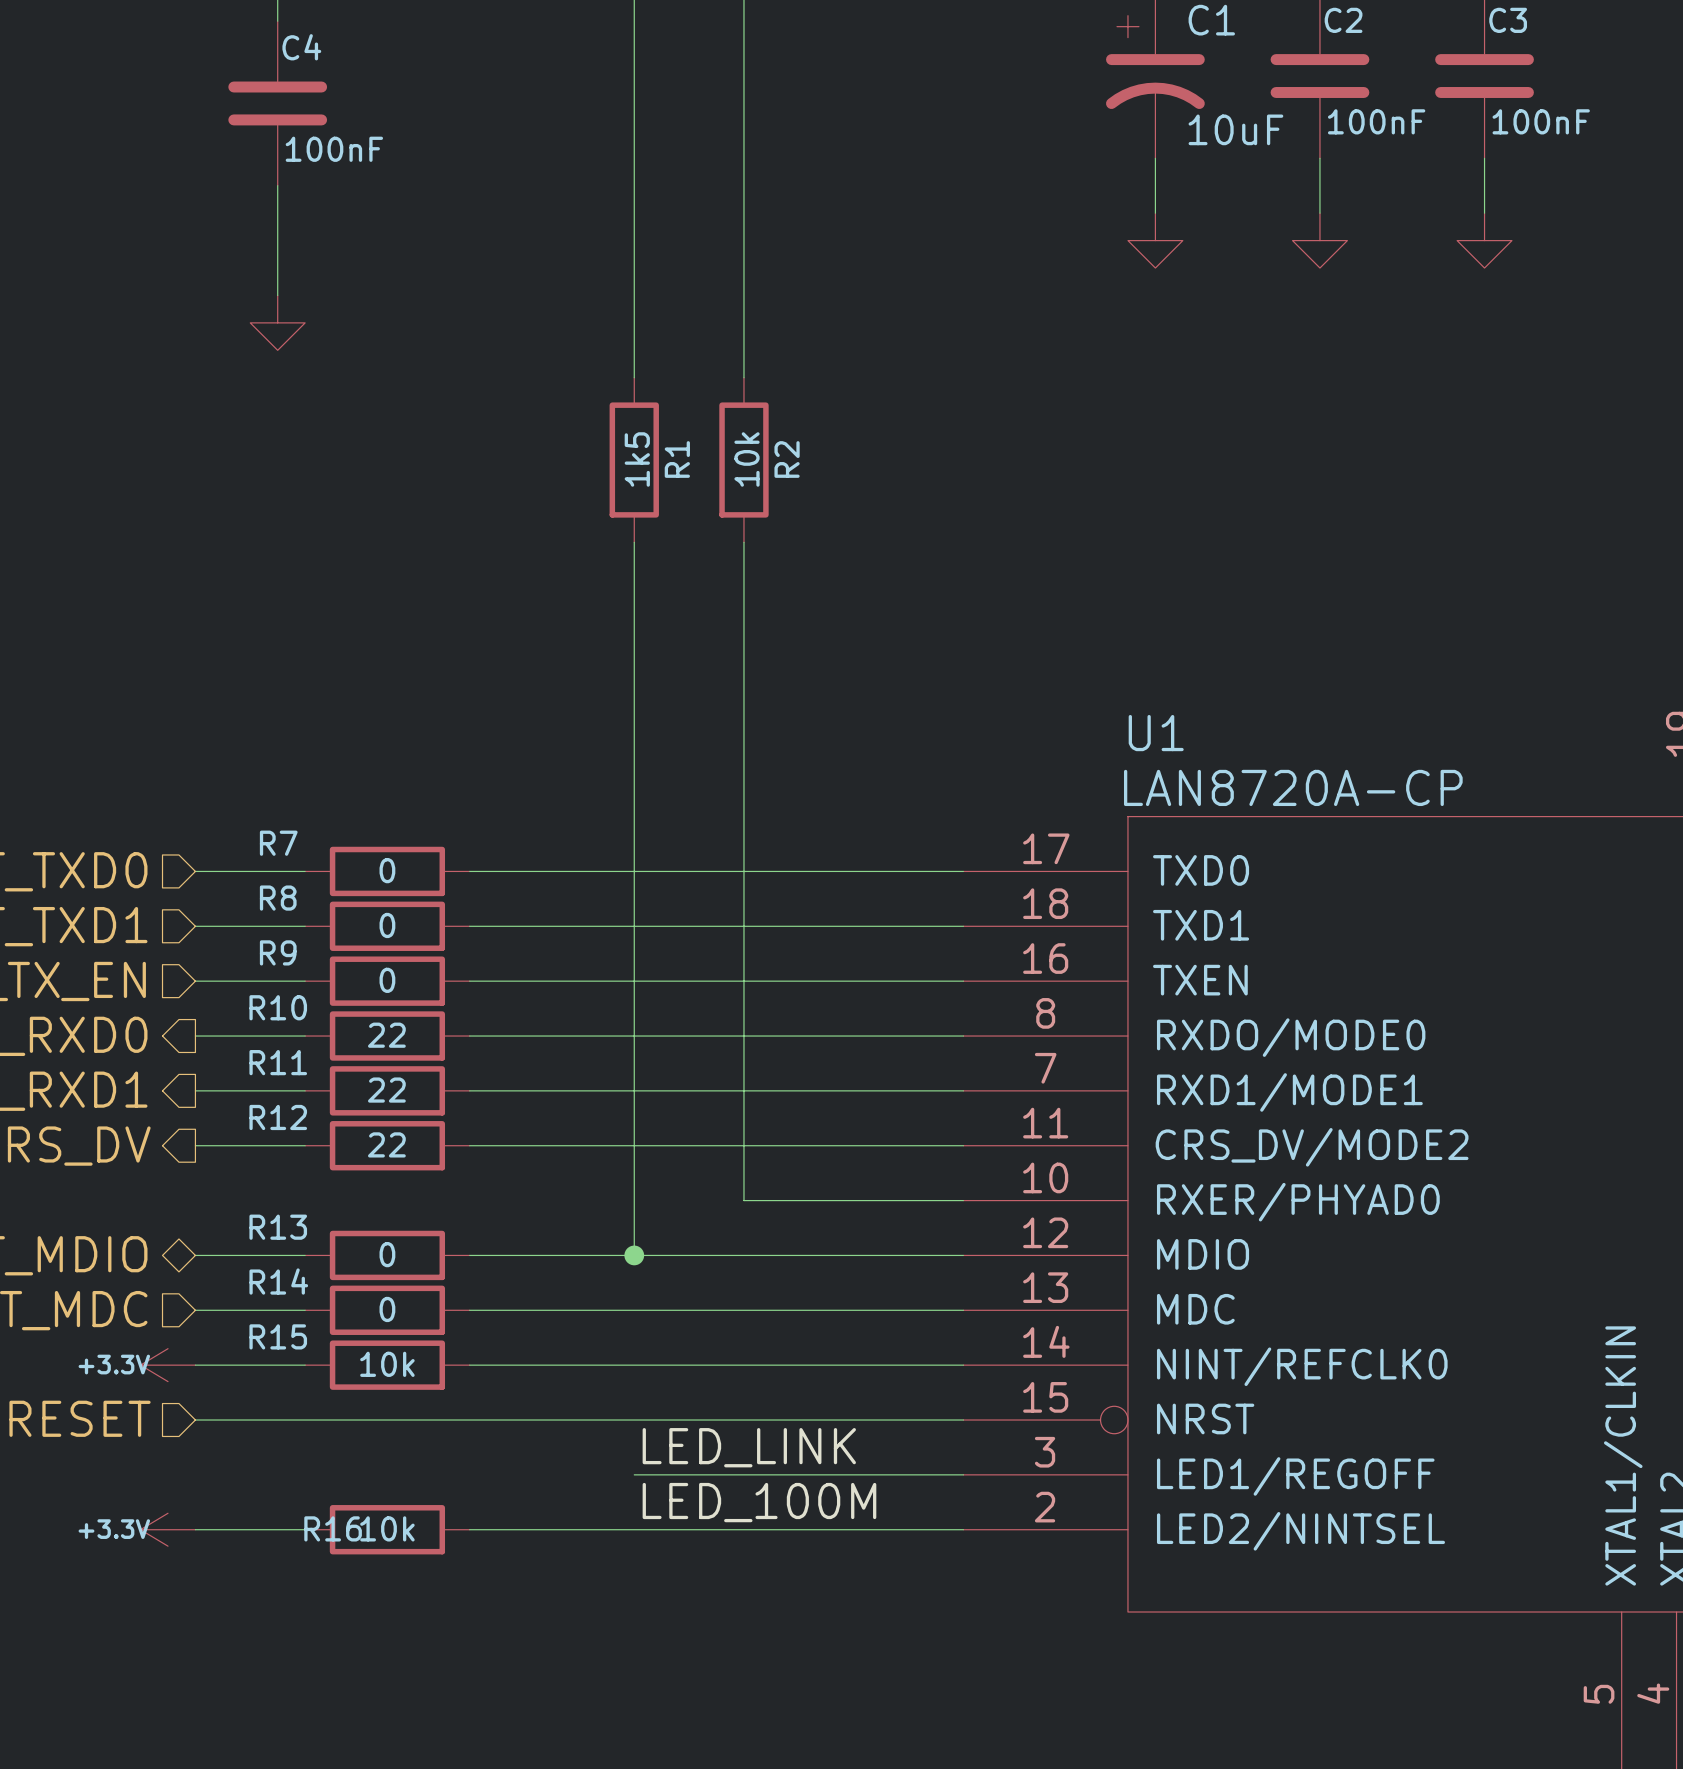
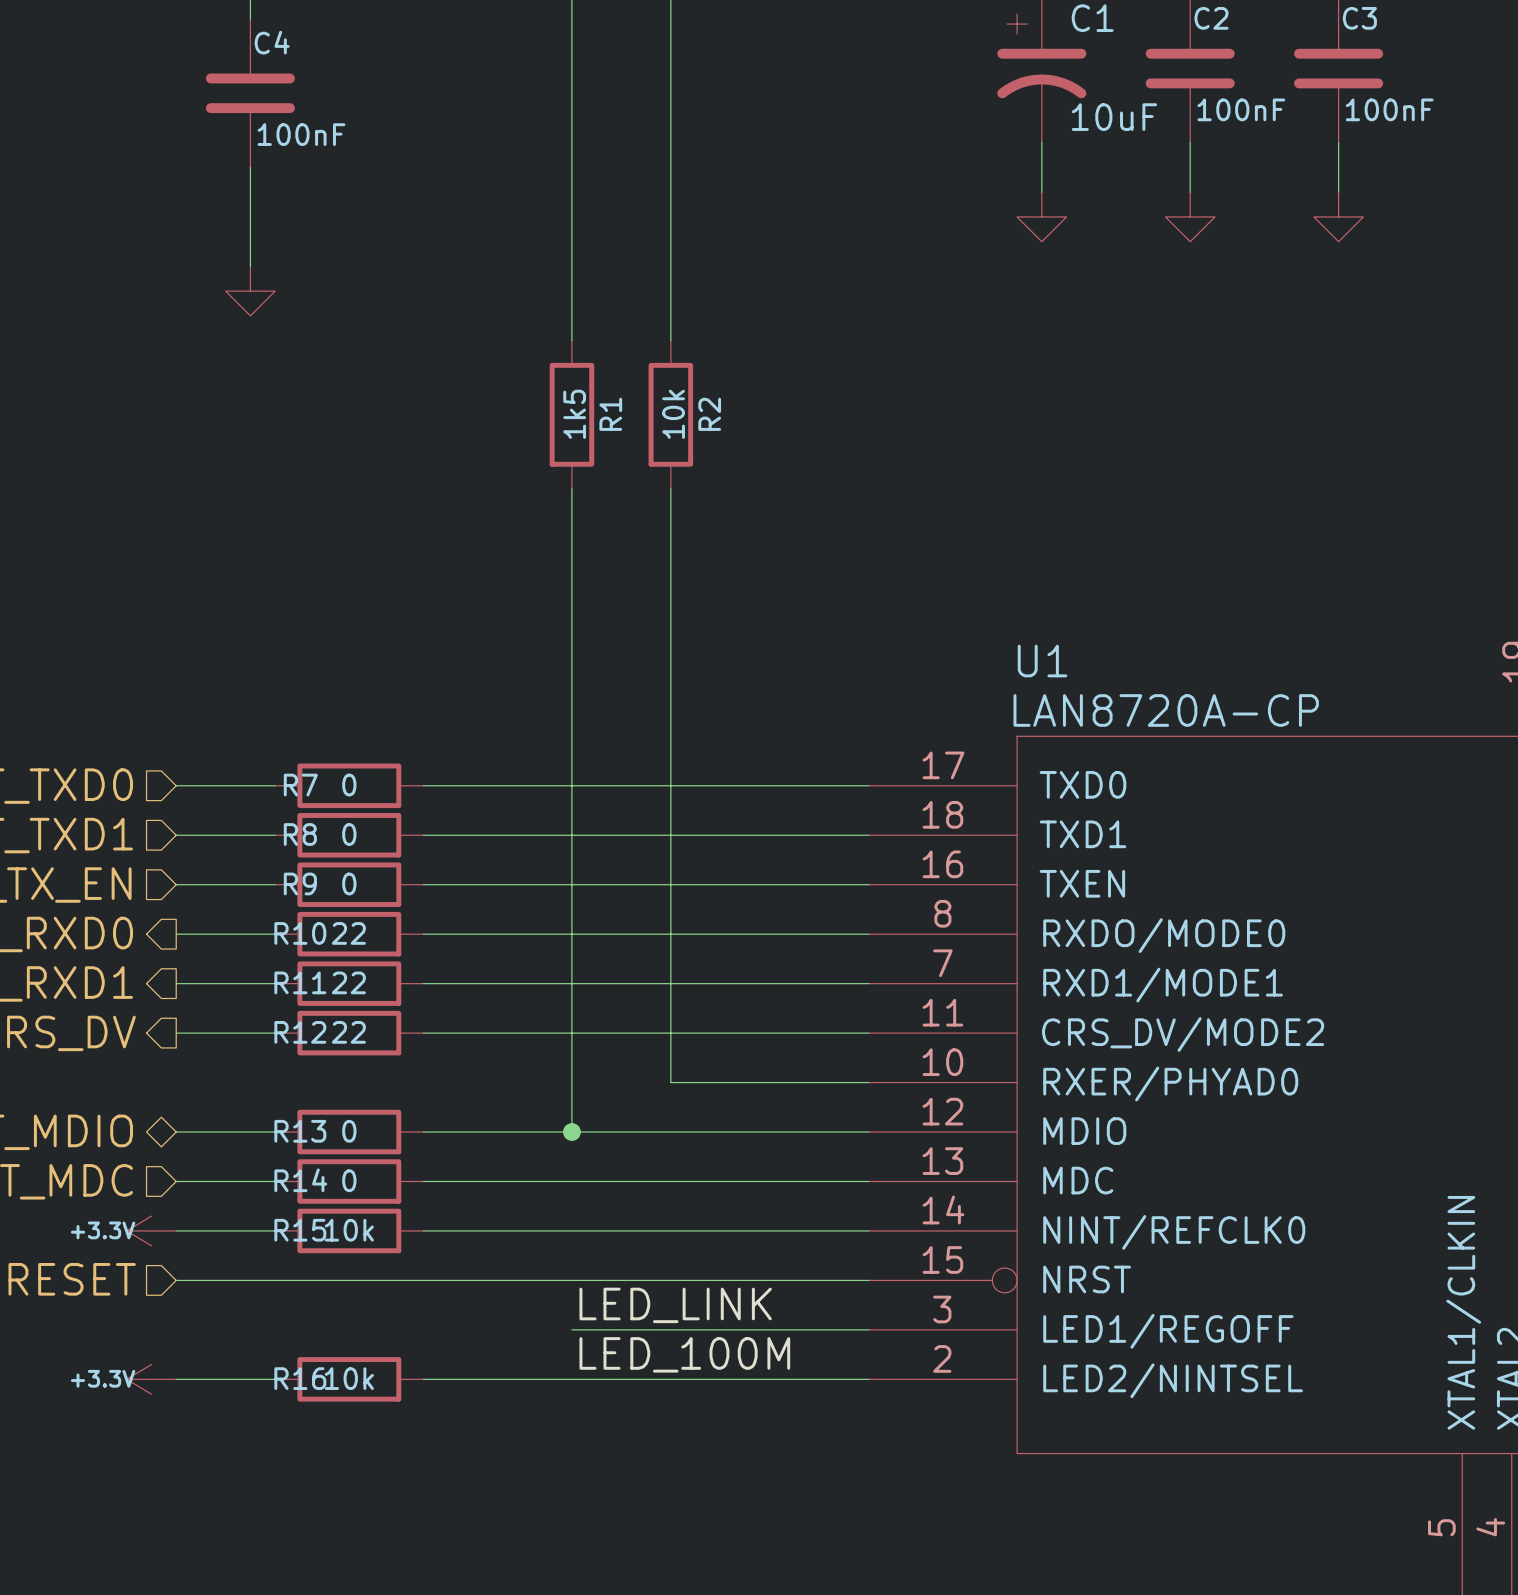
R7 name position: R7 (278, 843) -> R7 (300, 785)
R8 name position: R8 (278, 898) -> R8 (300, 834)
R9 name position: R9 (278, 952) -> R9 (300, 883)
R10 name position: R10 (278, 1007) -> R10 (300, 933)
R11 name position: R11 (278, 1062) -> R11 (300, 982)
R12 name position: R12 (278, 1117) -> R12 (300, 1032)
R13 name position: R13 (278, 1227) -> R13 (300, 1131)
R14 name position: R14 (278, 1281) -> R14 (300, 1180)
R15 name position: R15 (278, 1336) -> R15 (300, 1230)

